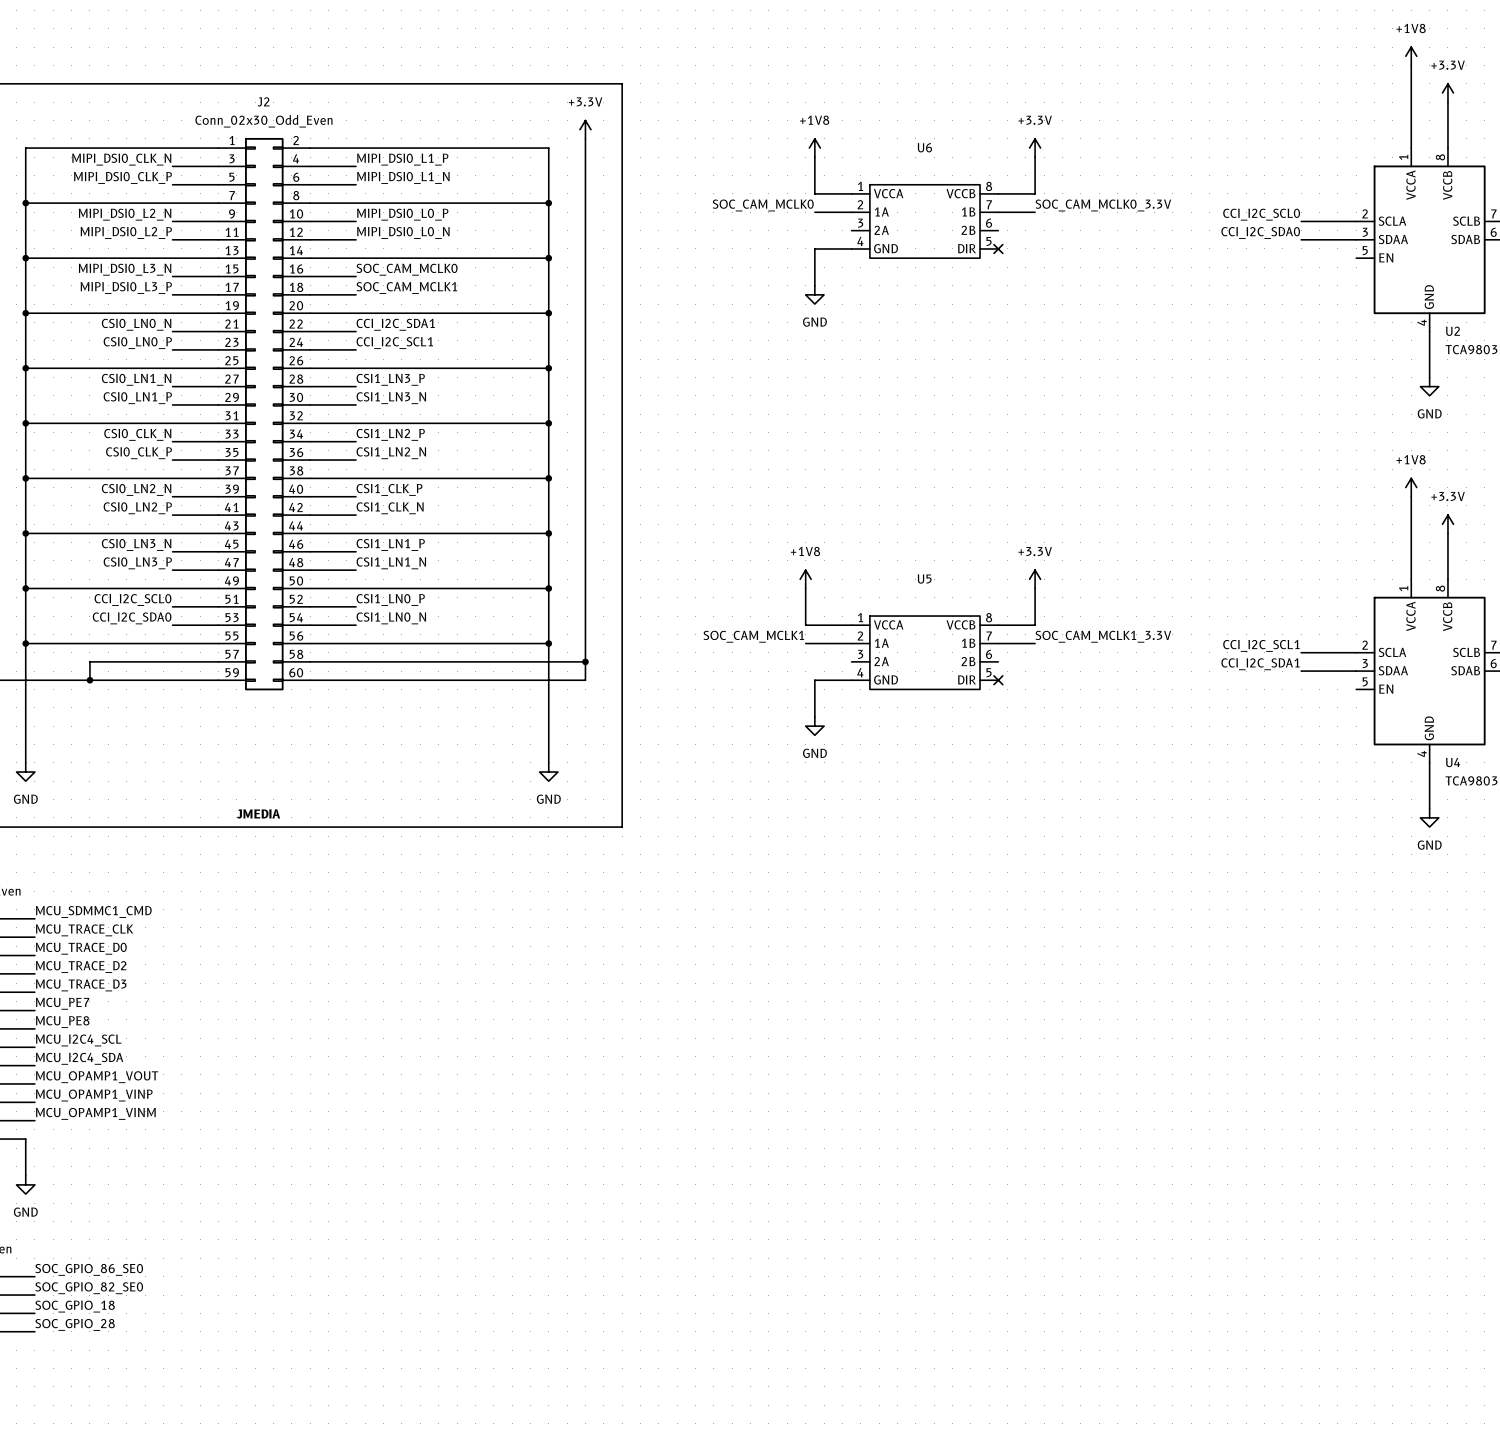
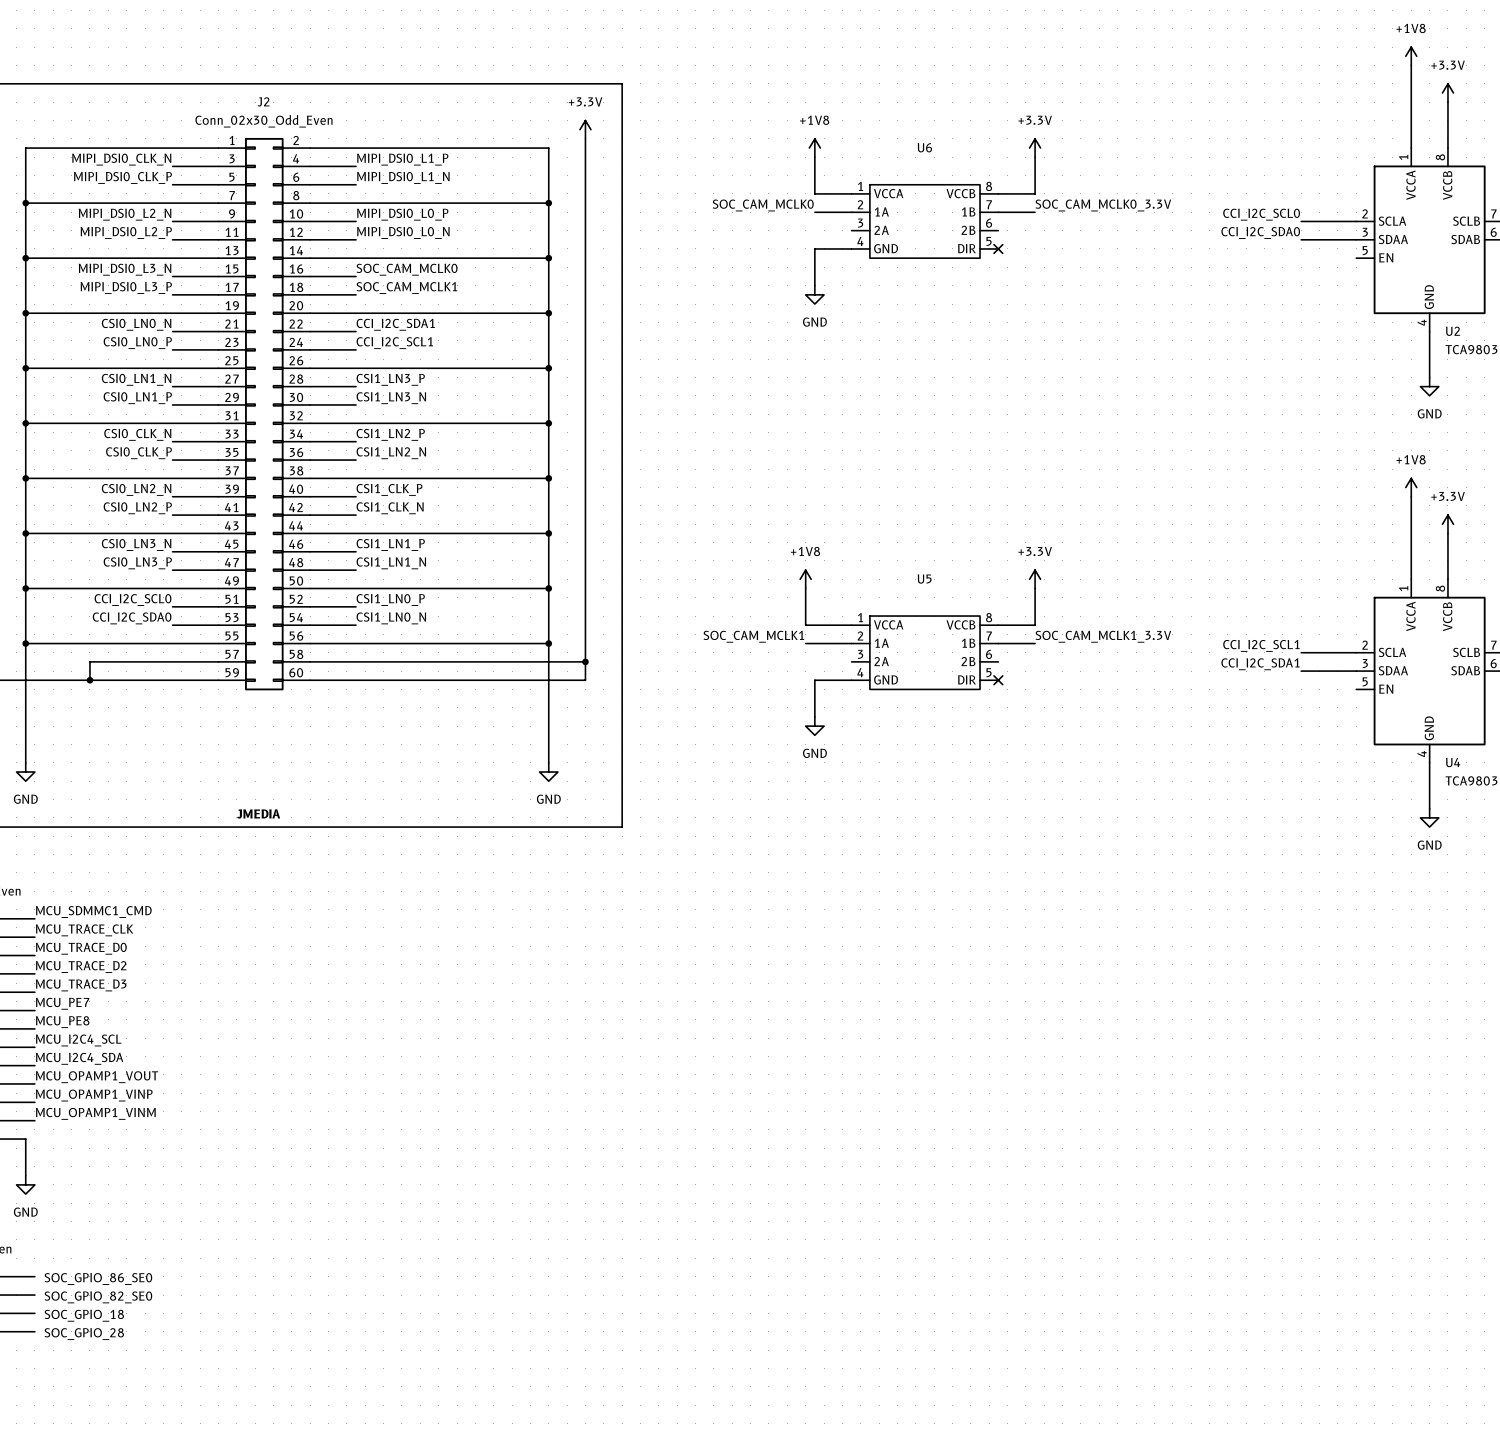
label position: SOC_GPIO_86_SE0 (89, 1269) -> SOC_GPIO_86_SE0 (98, 1279)
label position: SOC_GPIO_82_SE0 (89, 1288) -> SOC_GPIO_82_SE0 (98, 1297)
label position: SOC_GPIO_18 (75, 1306) -> SOC_GPIO_18 (84, 1315)
label position: SOC_GPIO_28 (75, 1324) -> SOC_GPIO_28 (84, 1334)

